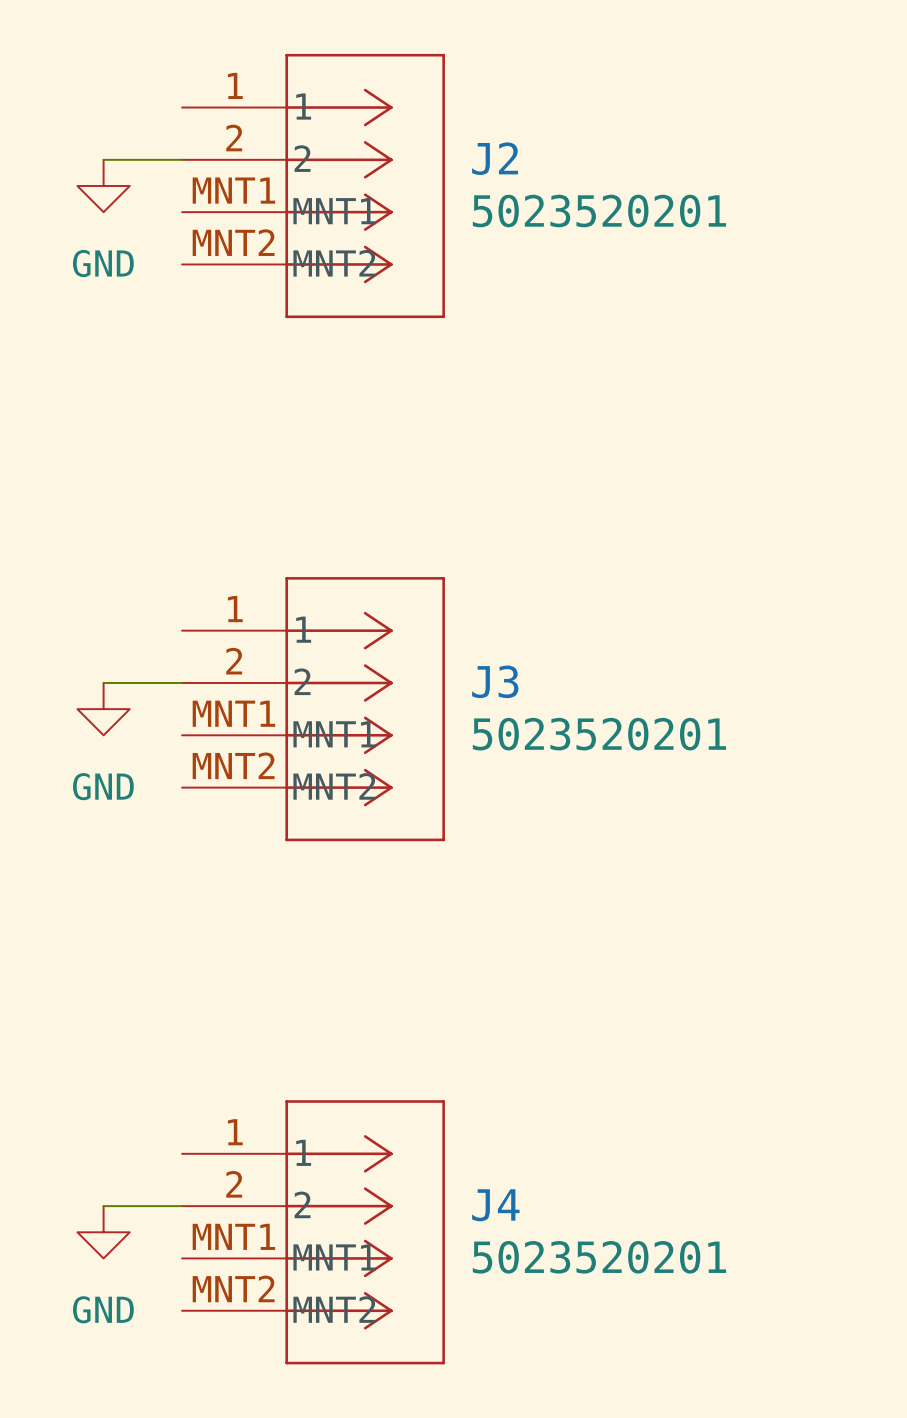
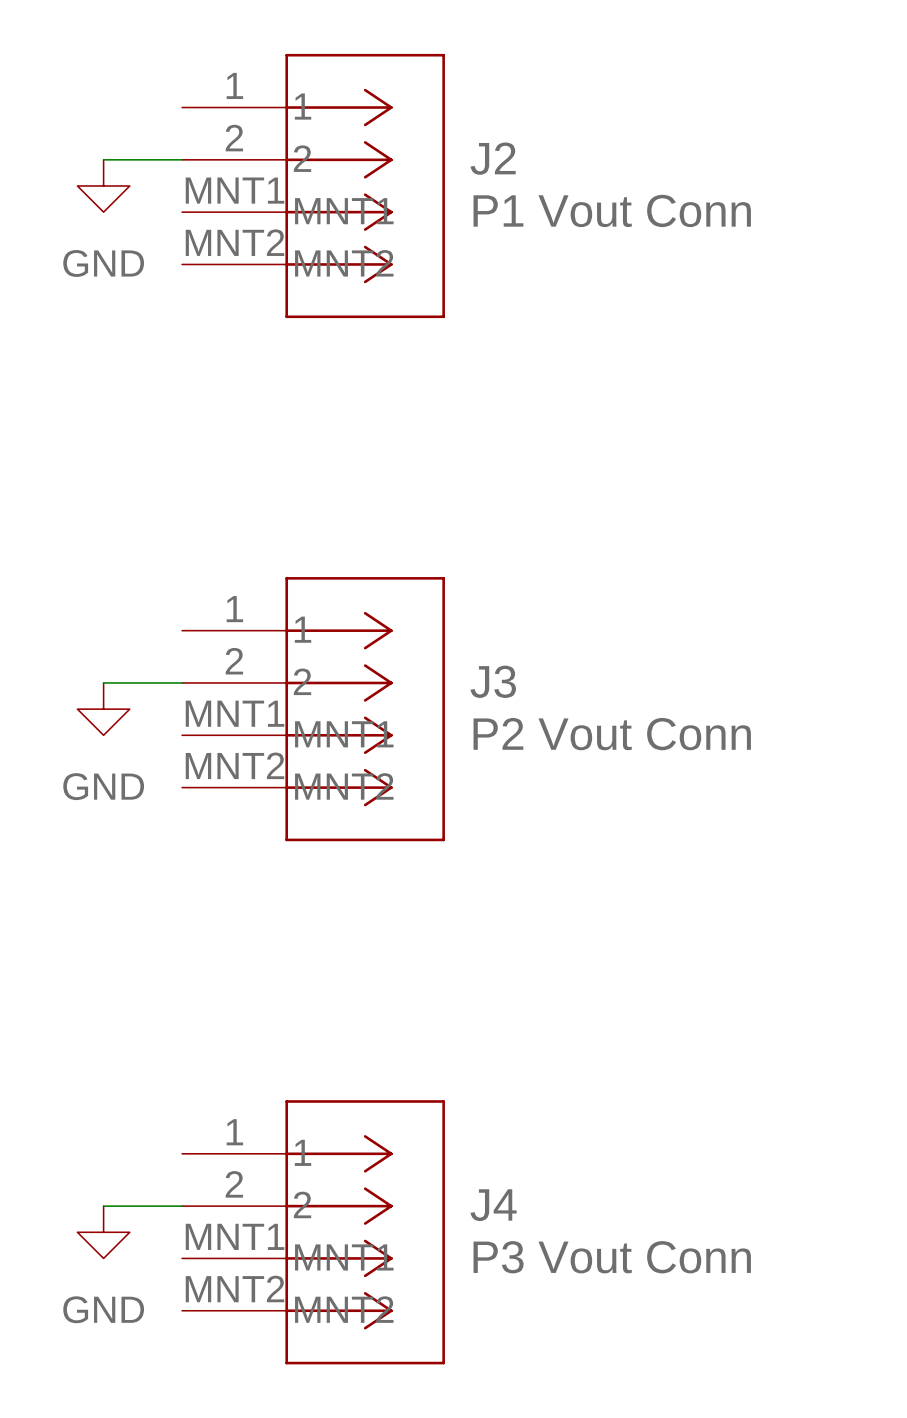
J2 value: 5023520201 (599, 211) -> P1 Vout Conn (612, 210)
J3 value: 5023520201 (599, 734) -> P2 Vout Conn (612, 734)
J4 value: 5023520201 (599, 1257) -> P3 Vout Conn (612, 1257)

